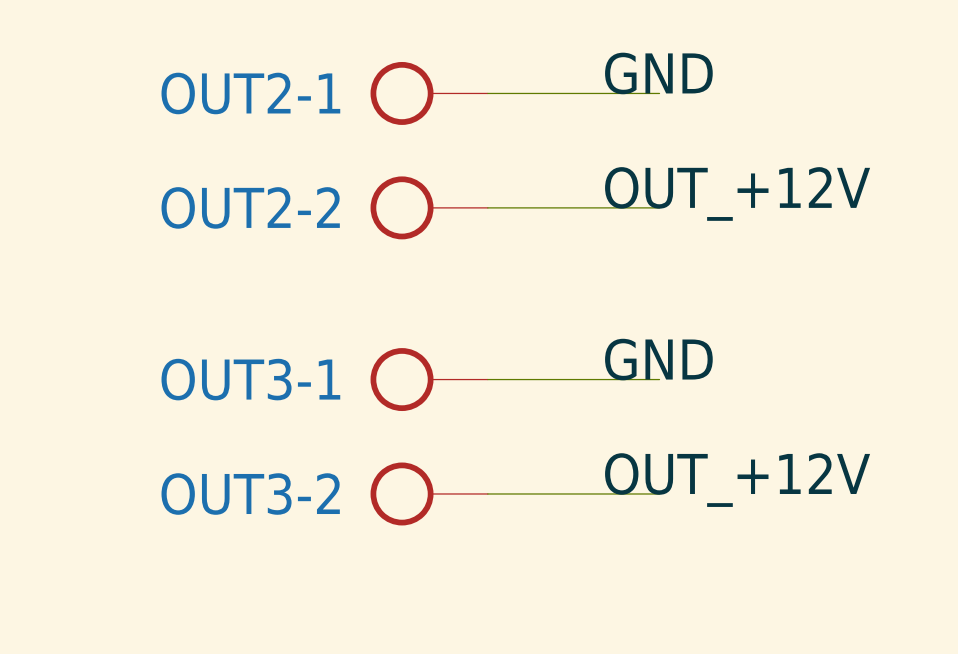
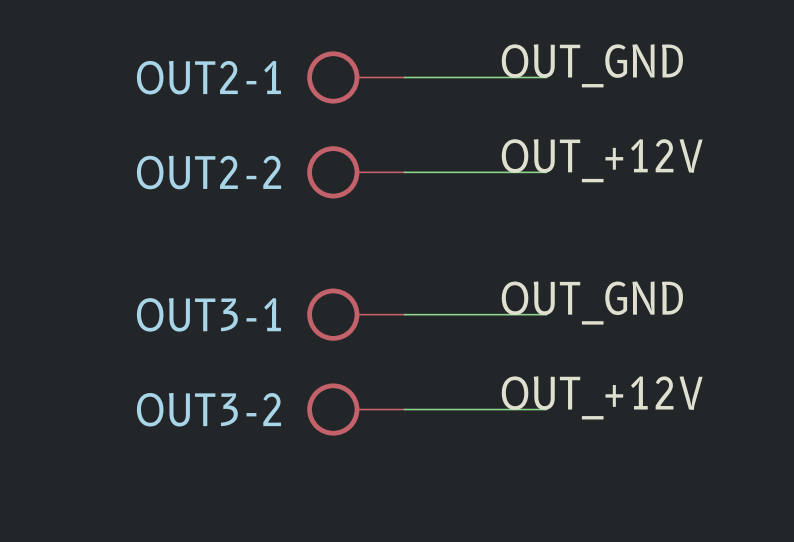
label: GND (658, 73) -> OUT_GND (592, 65)
label: GND (658, 359) -> OUT_GND (592, 303)

